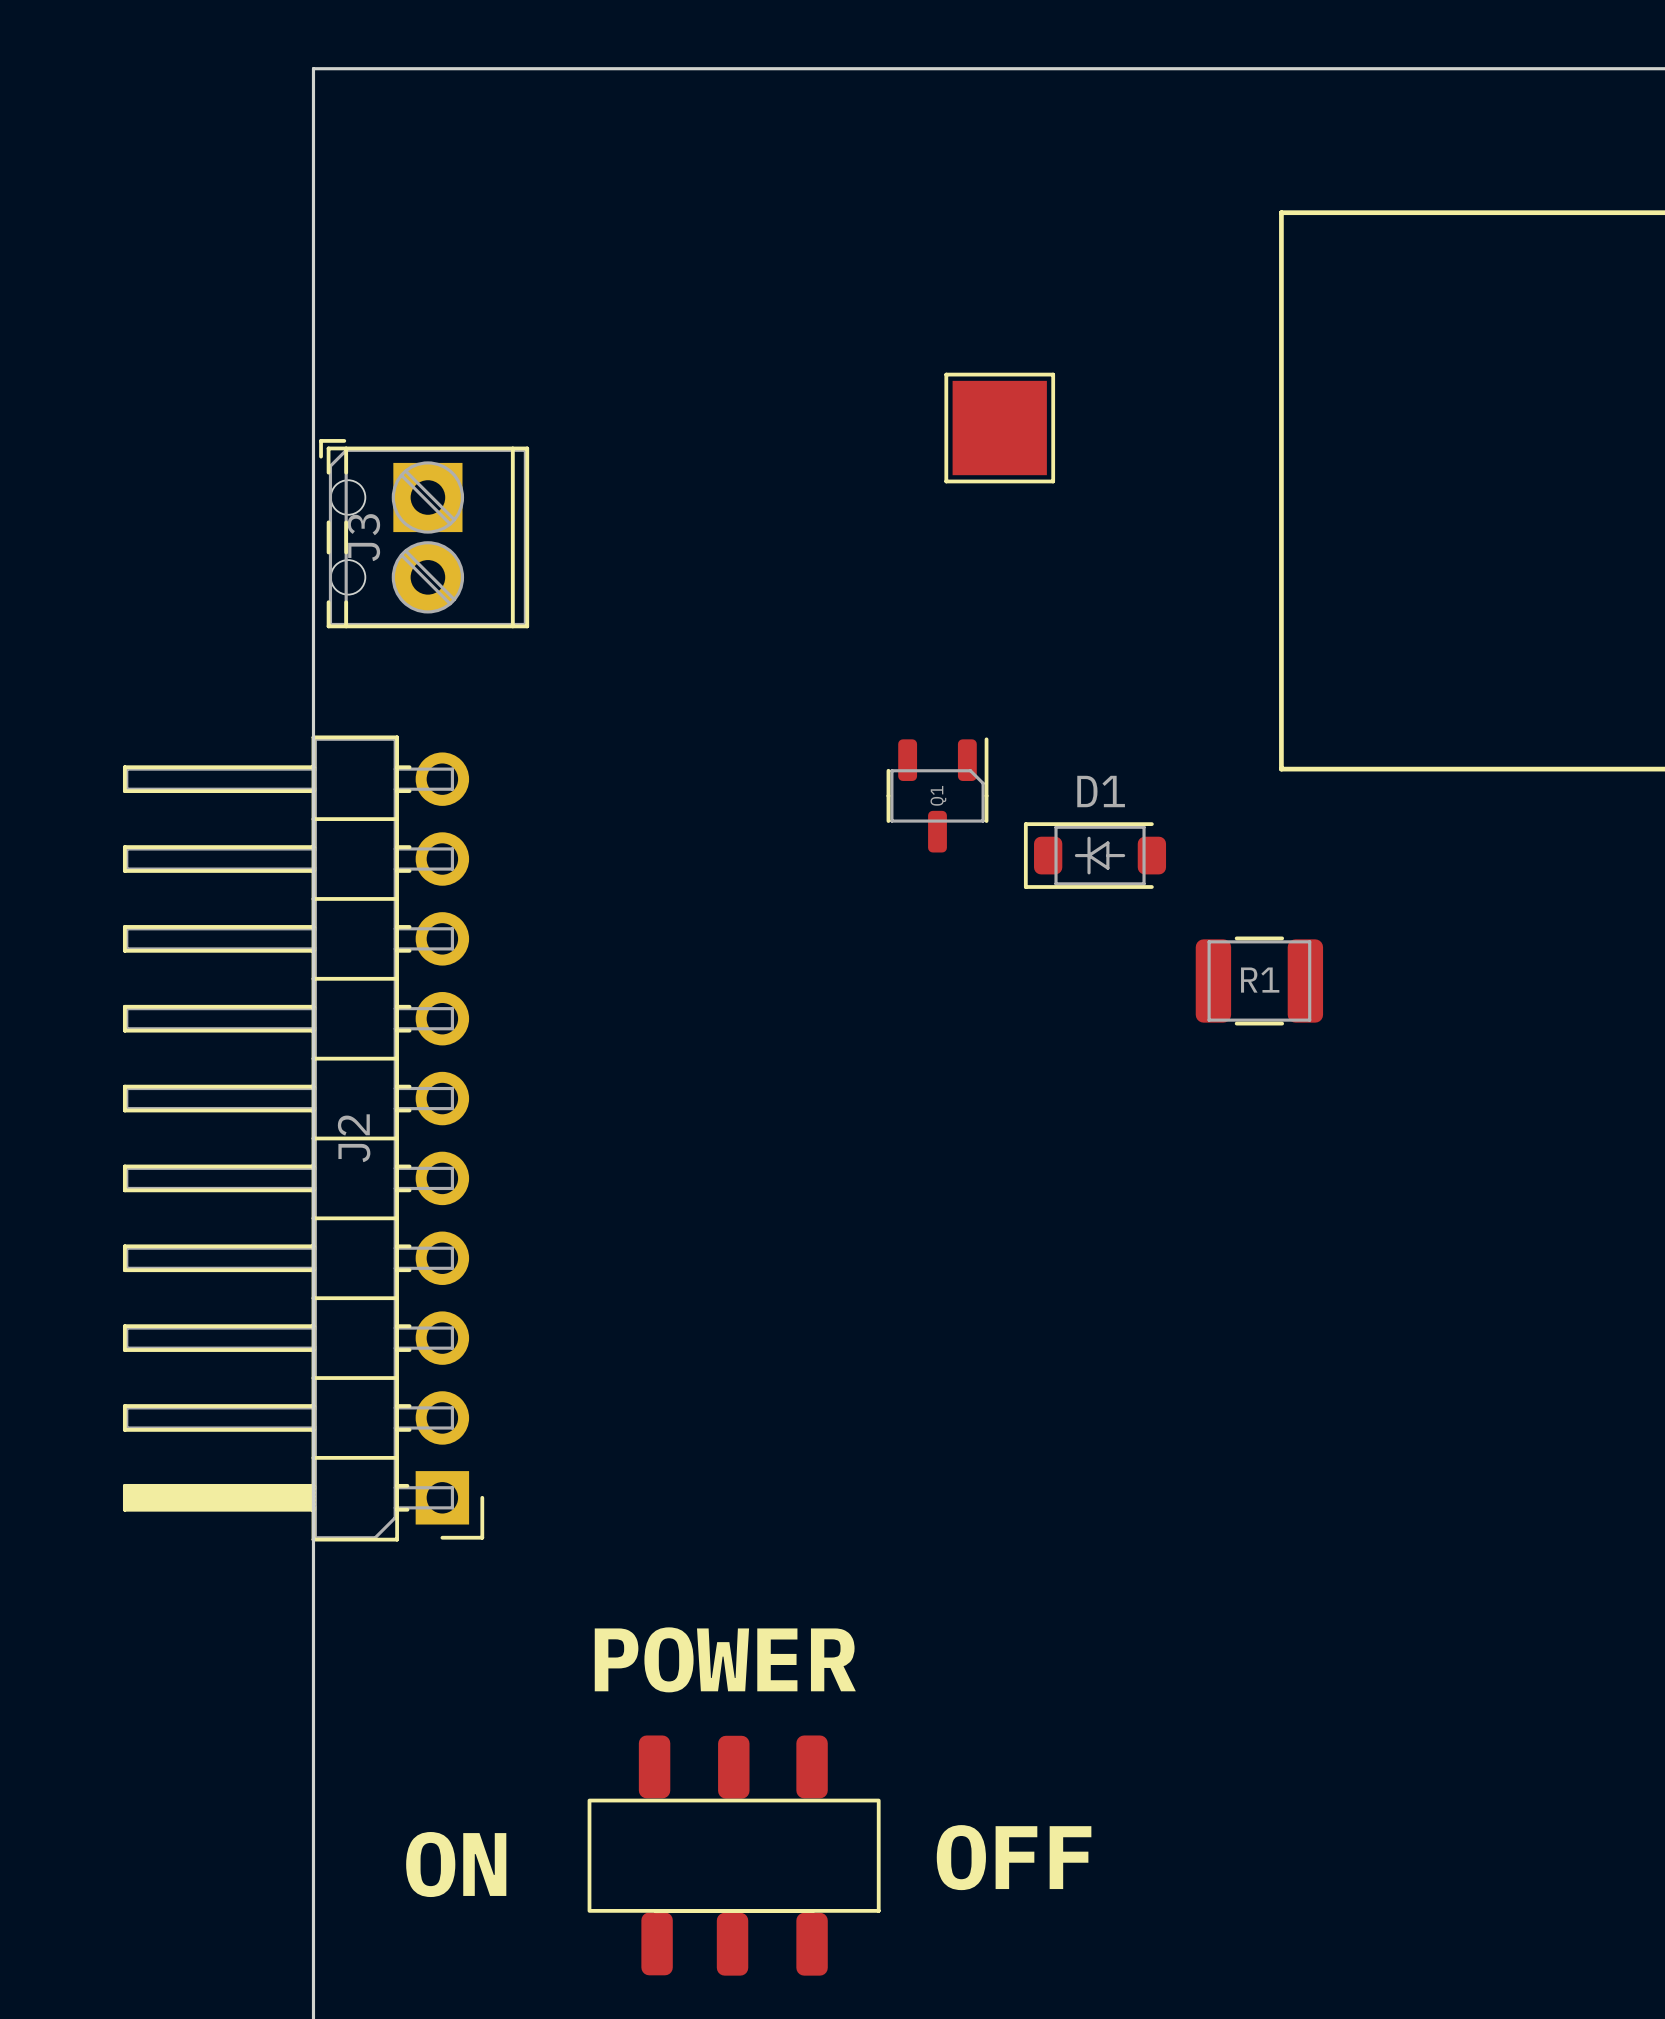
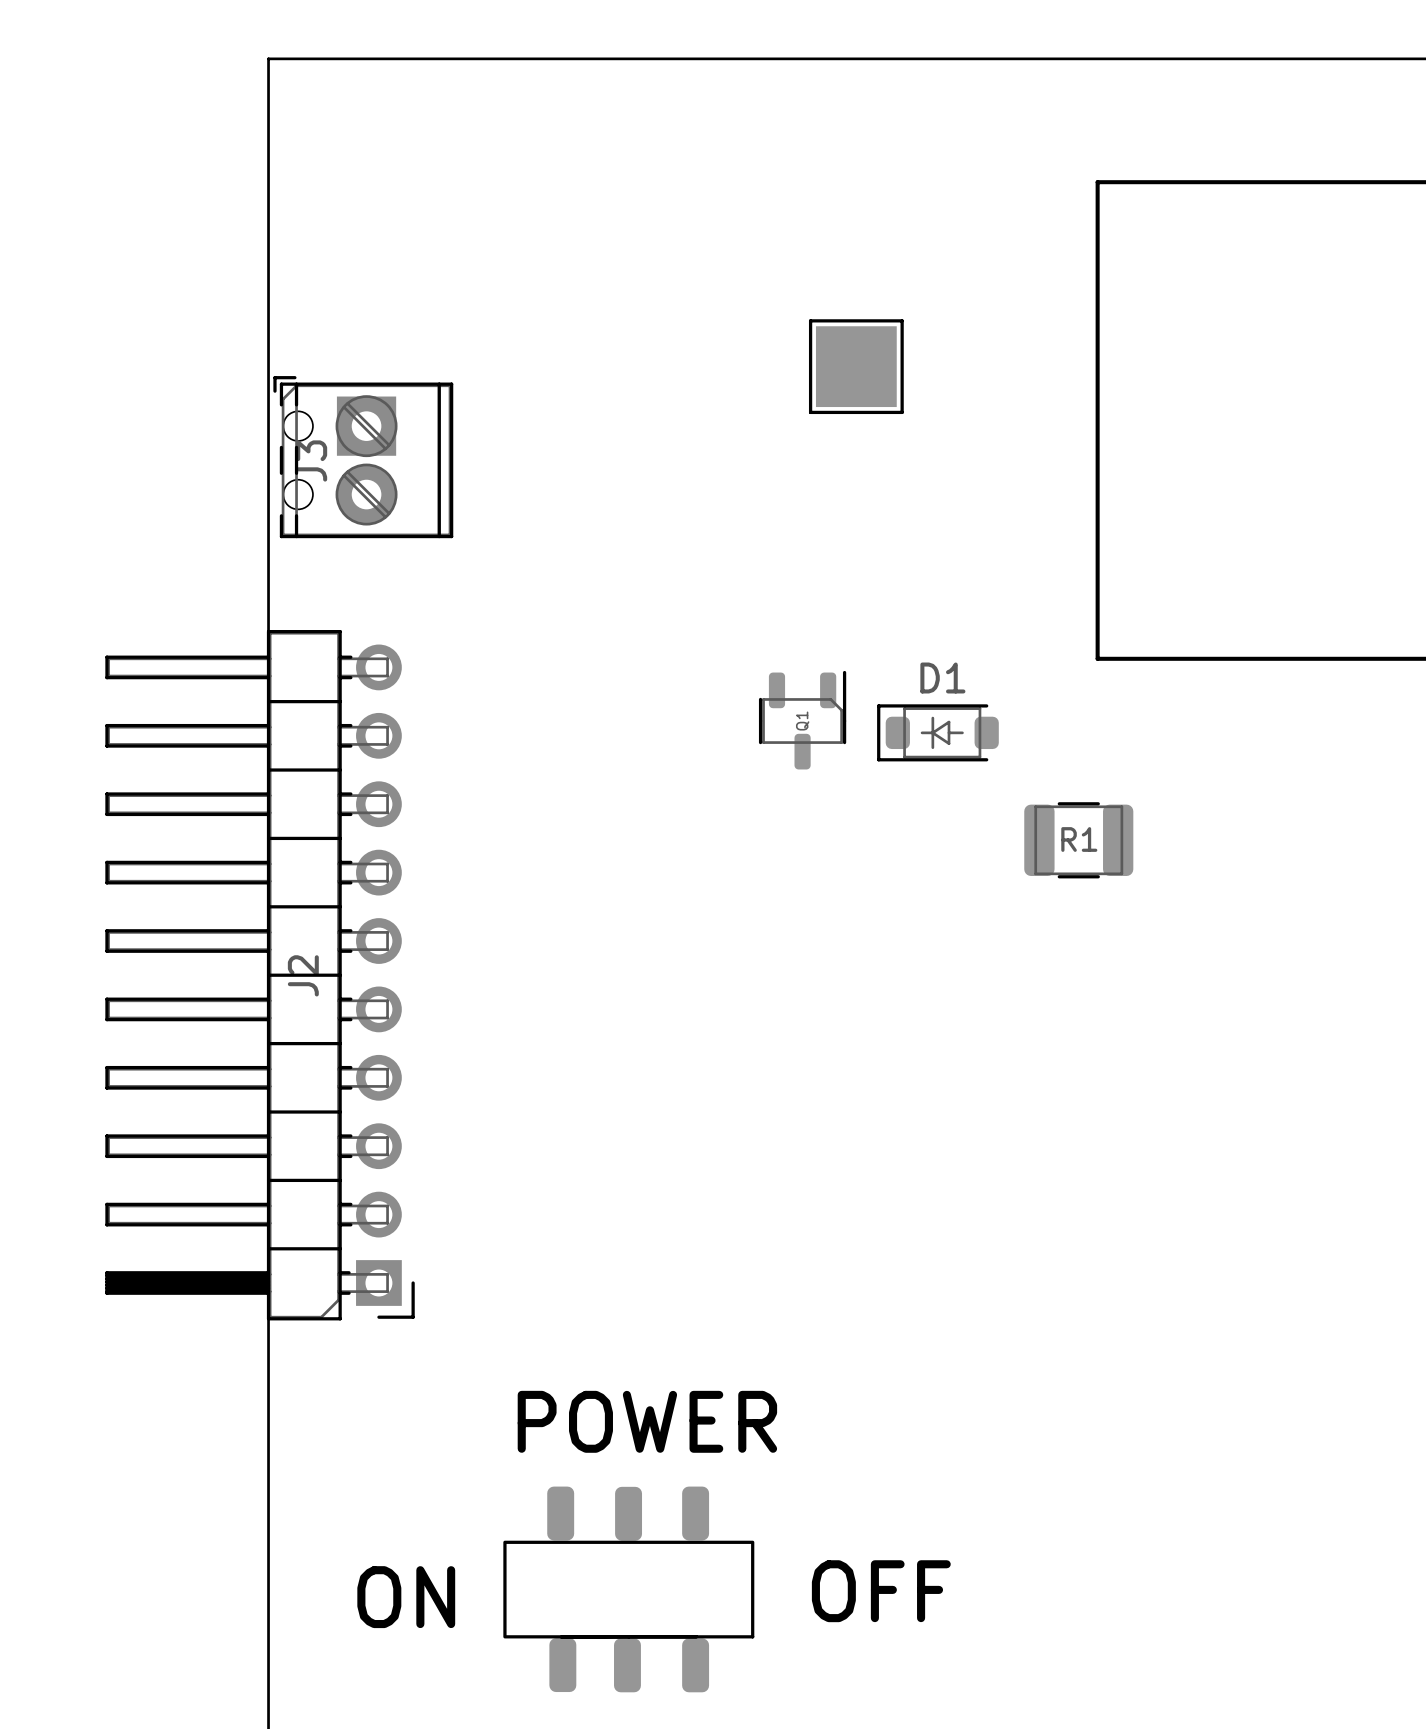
Q1 position: (937, 794) -> (802, 720)

